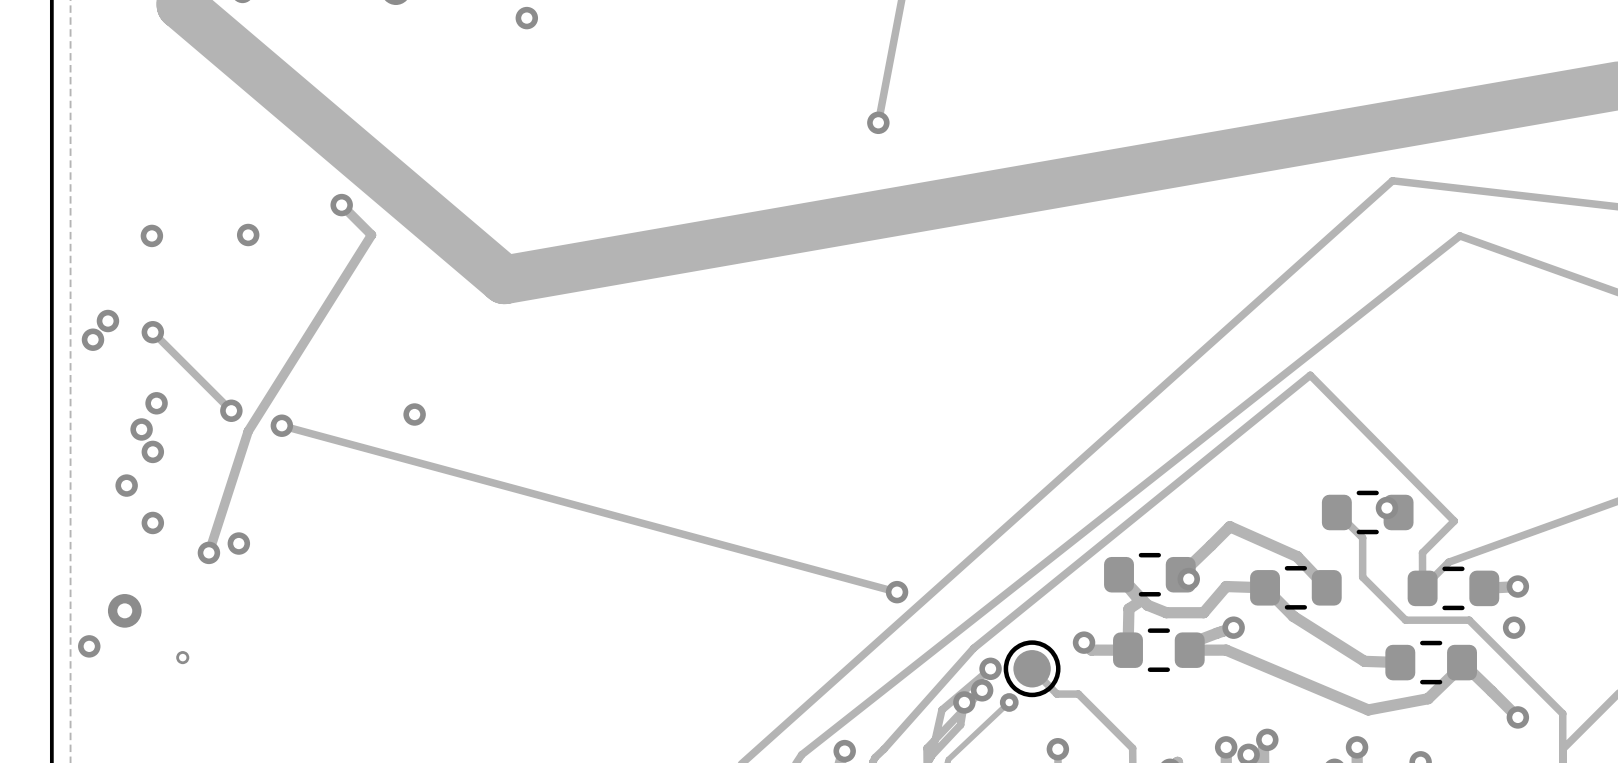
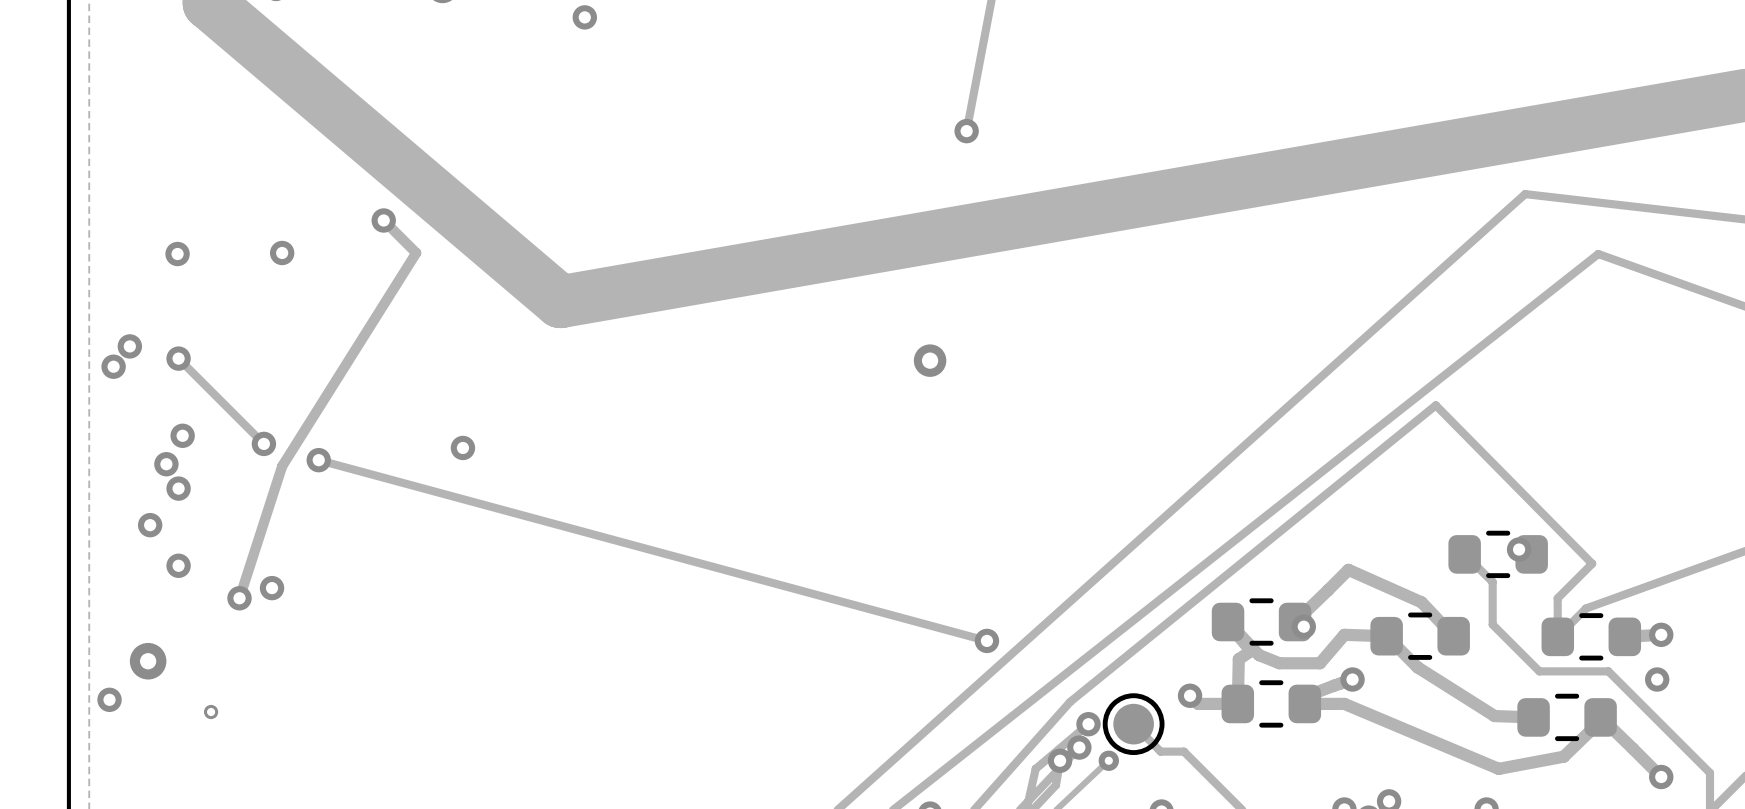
via: none -> (930, 360)

